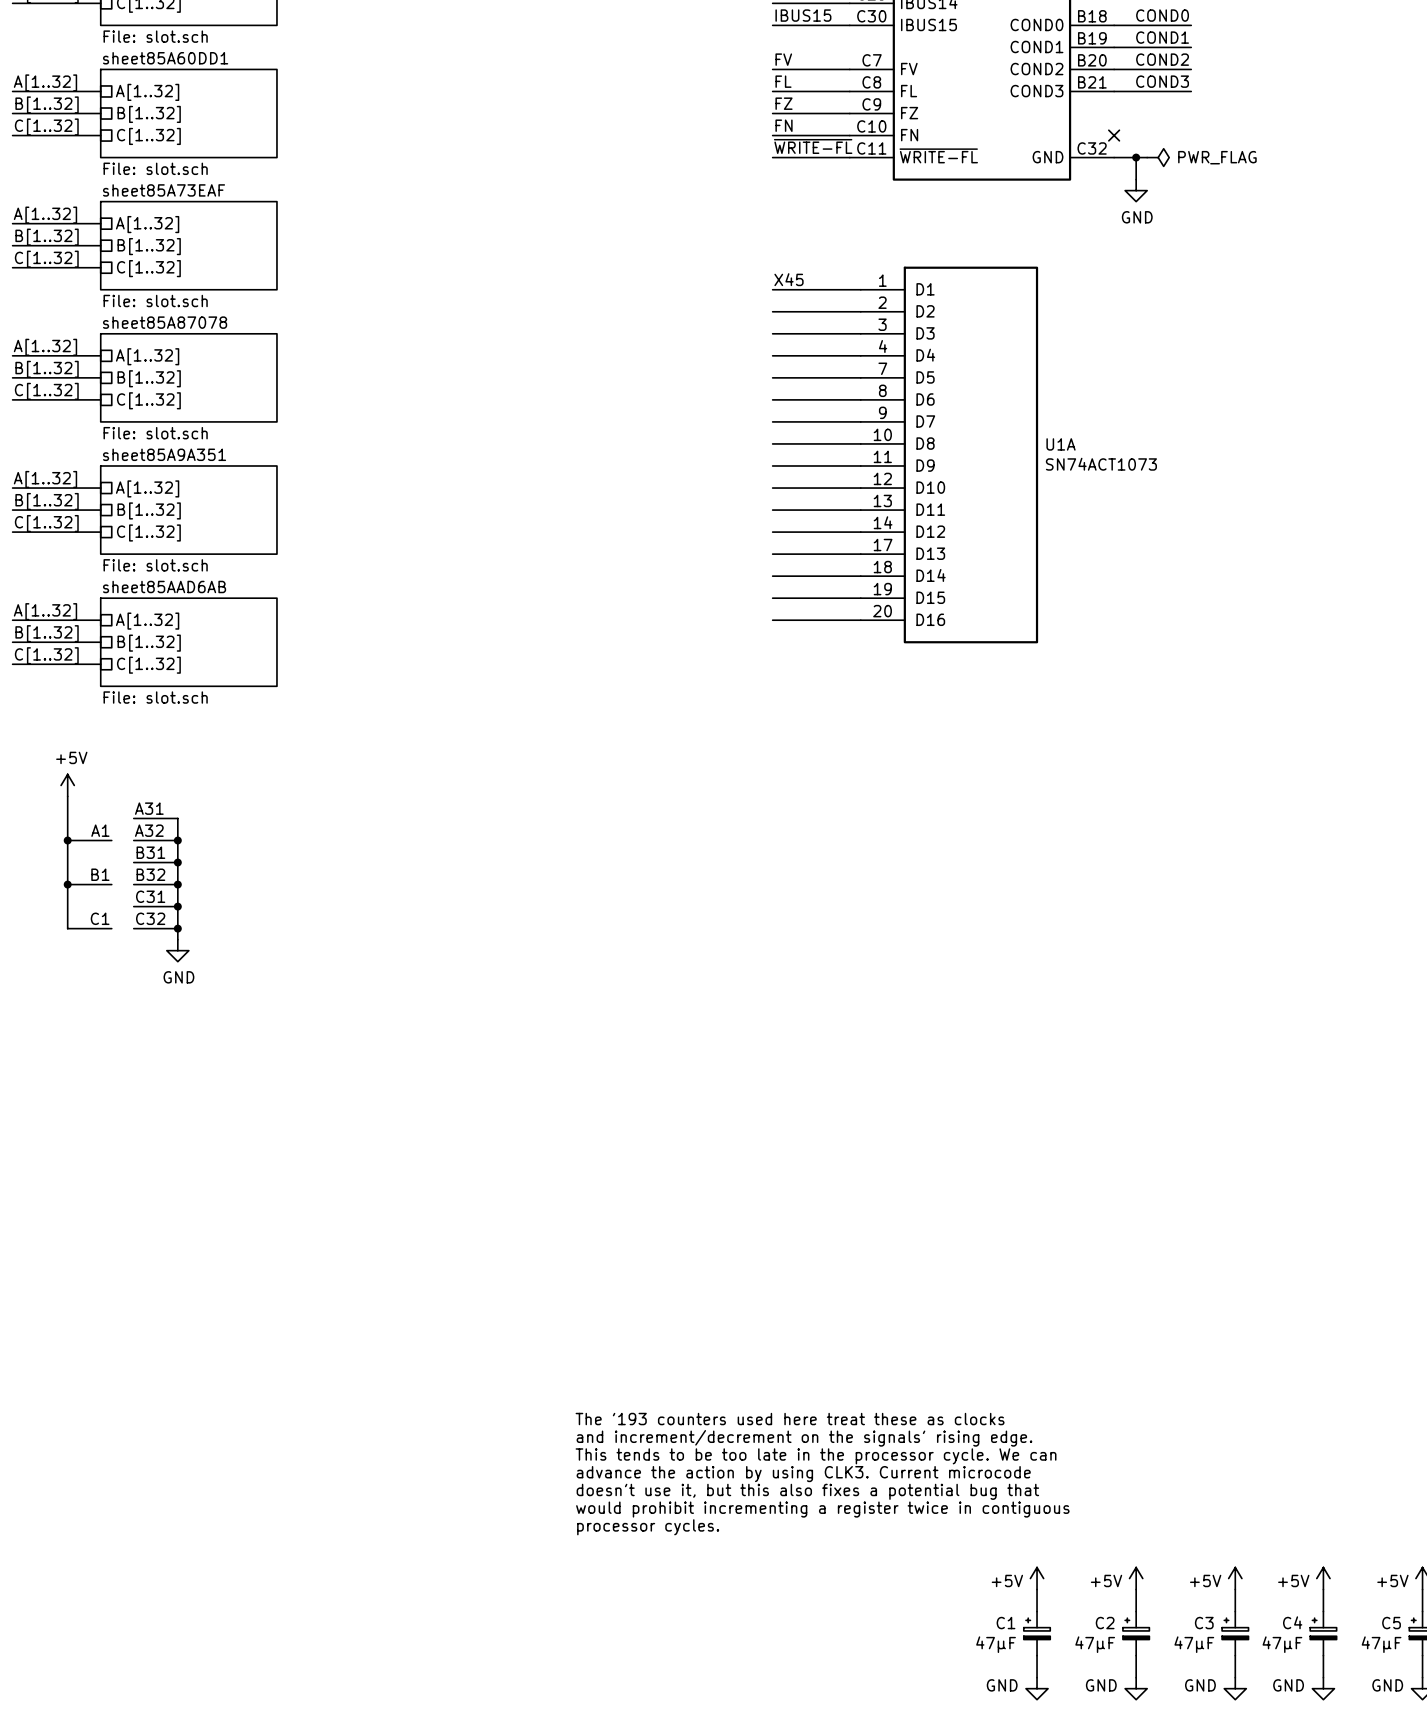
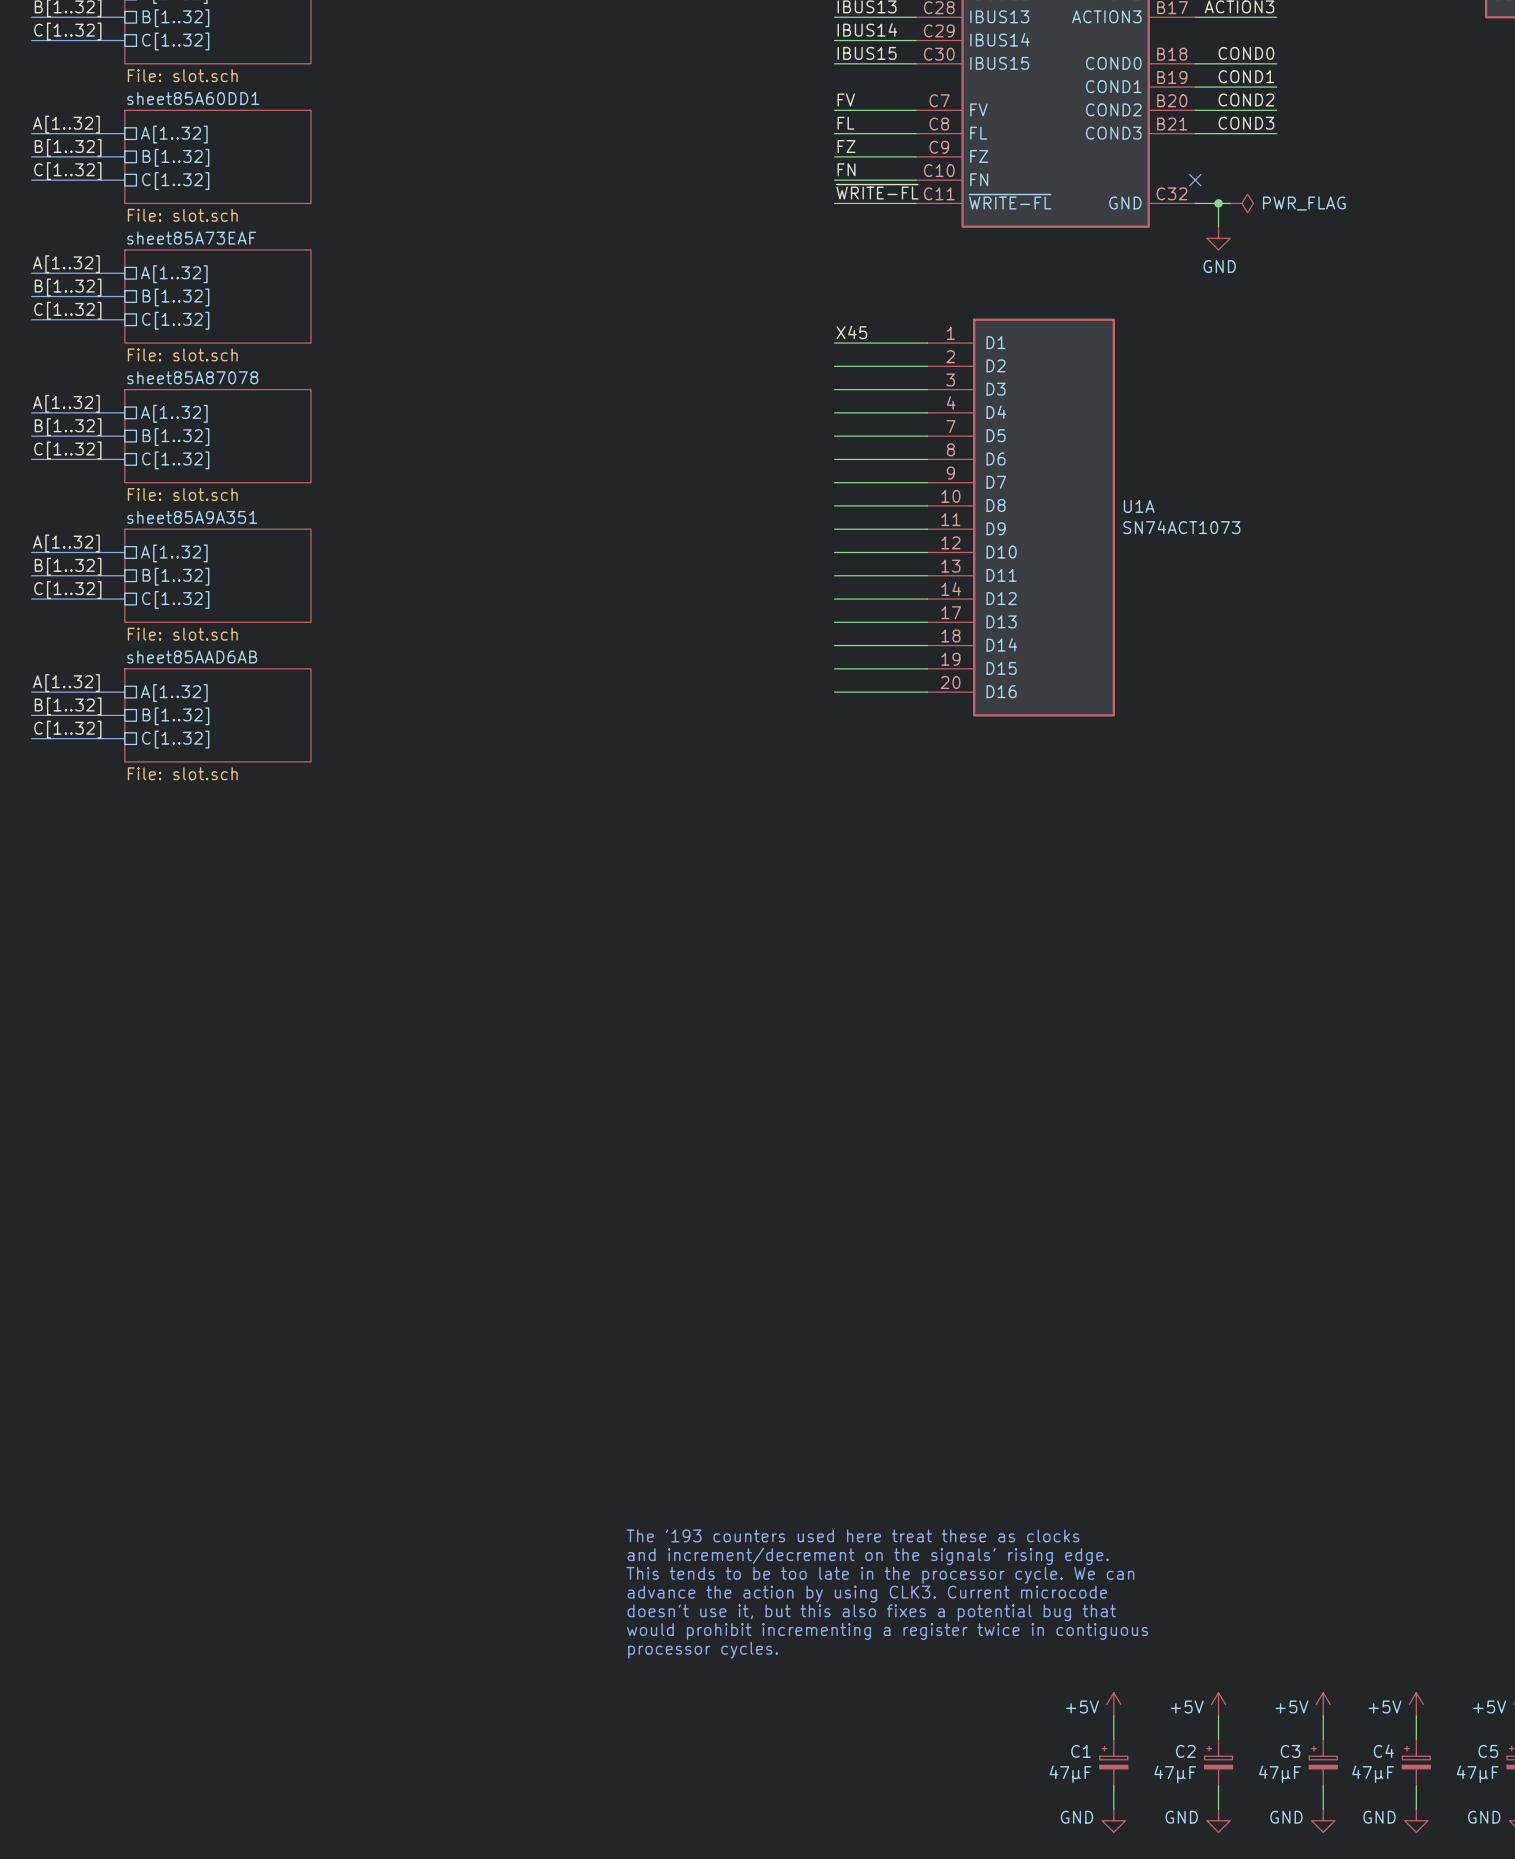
power symbol: +5V (67, 785) -> none
wire: (67, 796) (67, 928) (111, 928) -> none
label: A31 (149, 808) -> none
wire: (133, 818) (177, 818) (177, 939) -> none
label: A1 (100, 830) -> none
label: A32 (149, 830) -> none
wire: (67, 840) (111, 840) -> none
junction: (67, 840) -> none
wire: (133, 840) (177, 840) -> none
junction: (177, 840) -> none
label: B31 (150, 852) -> none
wire: (133, 862) (177, 862) -> none
junction: (177, 862) -> none
label: B1 (100, 874) -> none
label: B32 (150, 874) -> none
wire: (67, 884) (111, 884) -> none
junction: (67, 884) -> none
wire: (133, 884) (177, 884) -> none
junction: (177, 884) -> none
label: C31 (150, 896) -> none
wire: (133, 906) (177, 906) -> none
junction: (177, 906) -> none
label: C1 (100, 918) -> none
label: C32 (150, 918) -> none
wire: (133, 928) (177, 928) -> none
junction: (177, 928) -> none
power symbol: GND (177, 950) -> none

